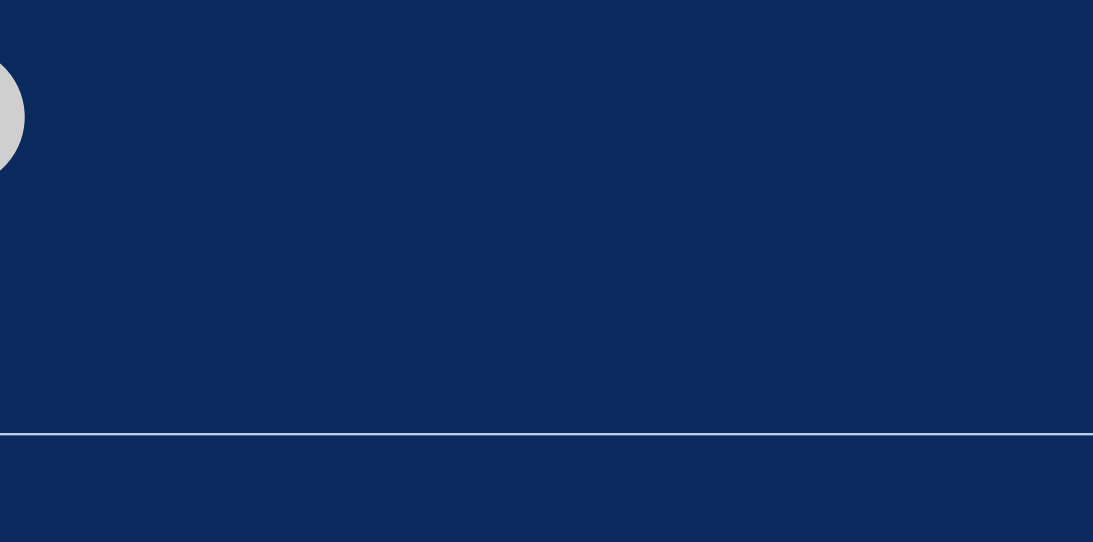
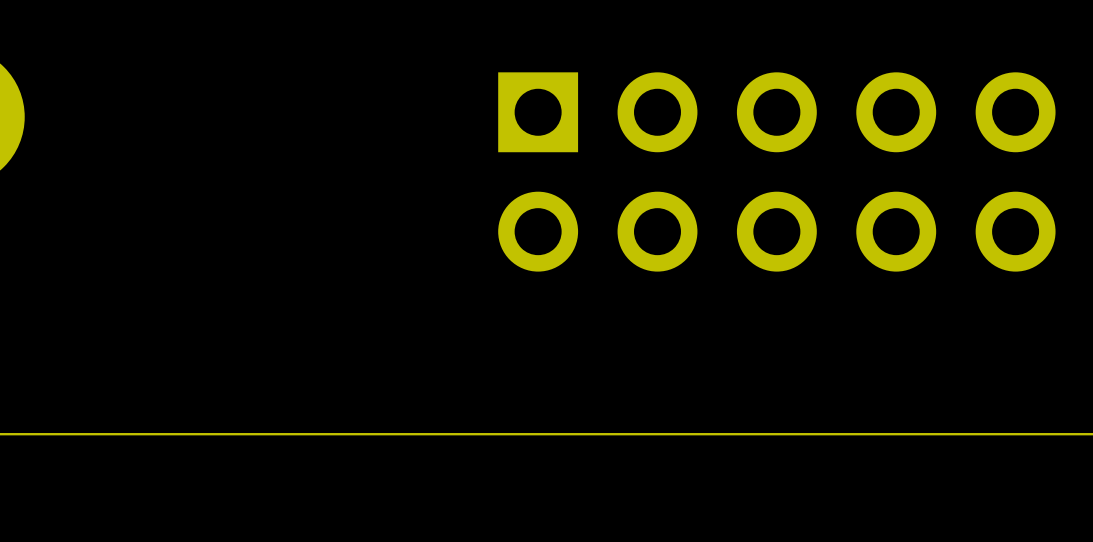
part: none -> (776, 171)

